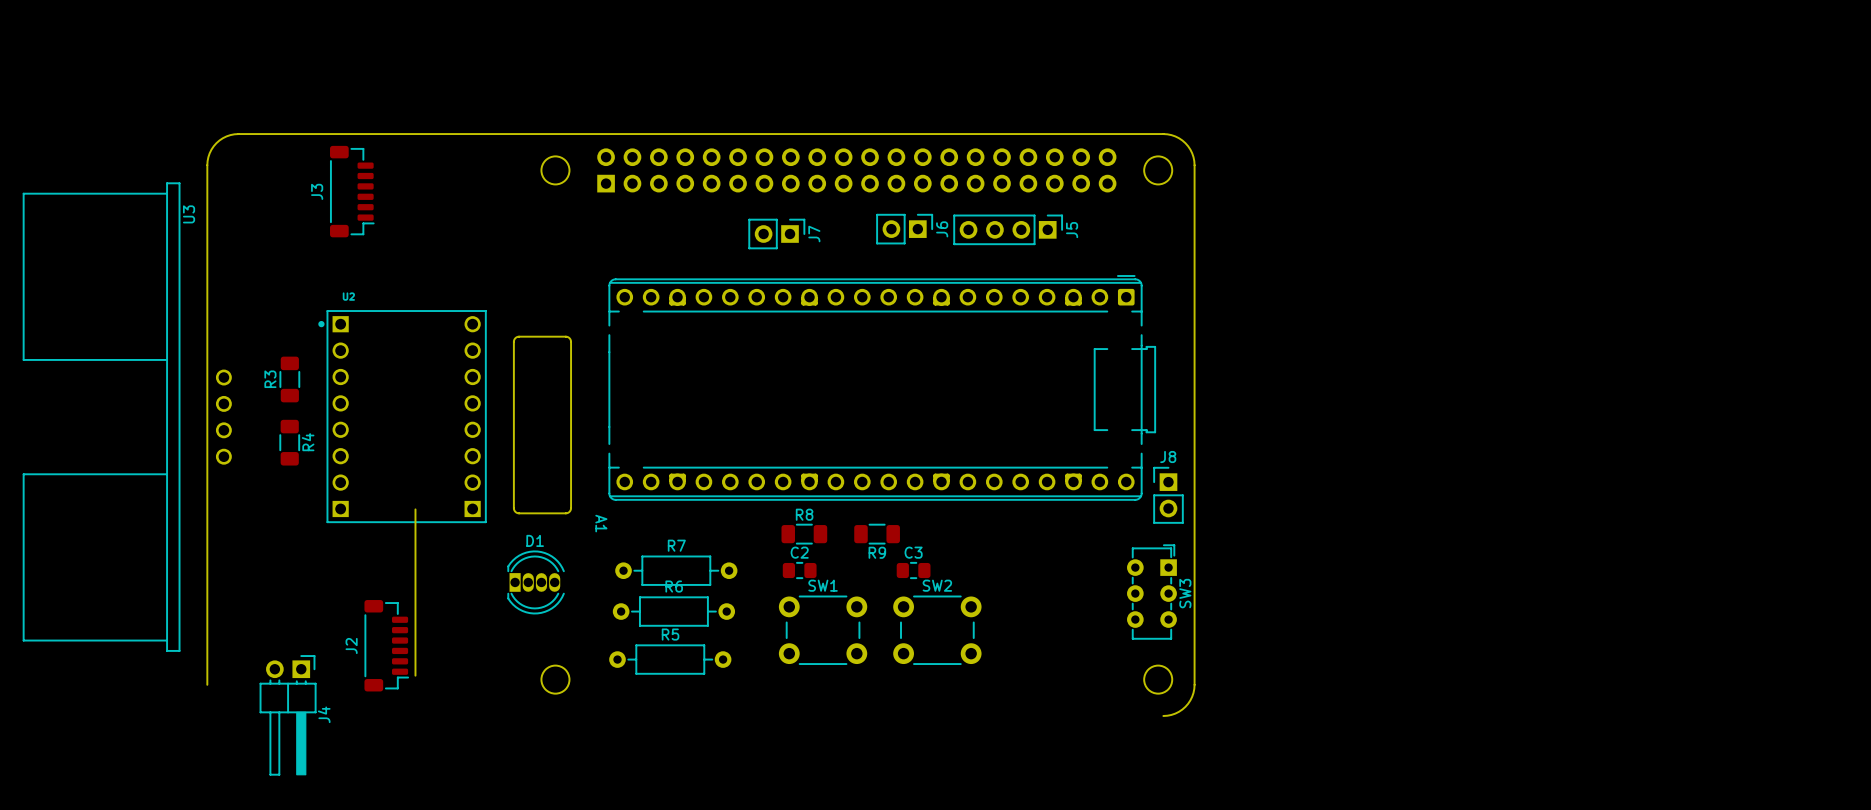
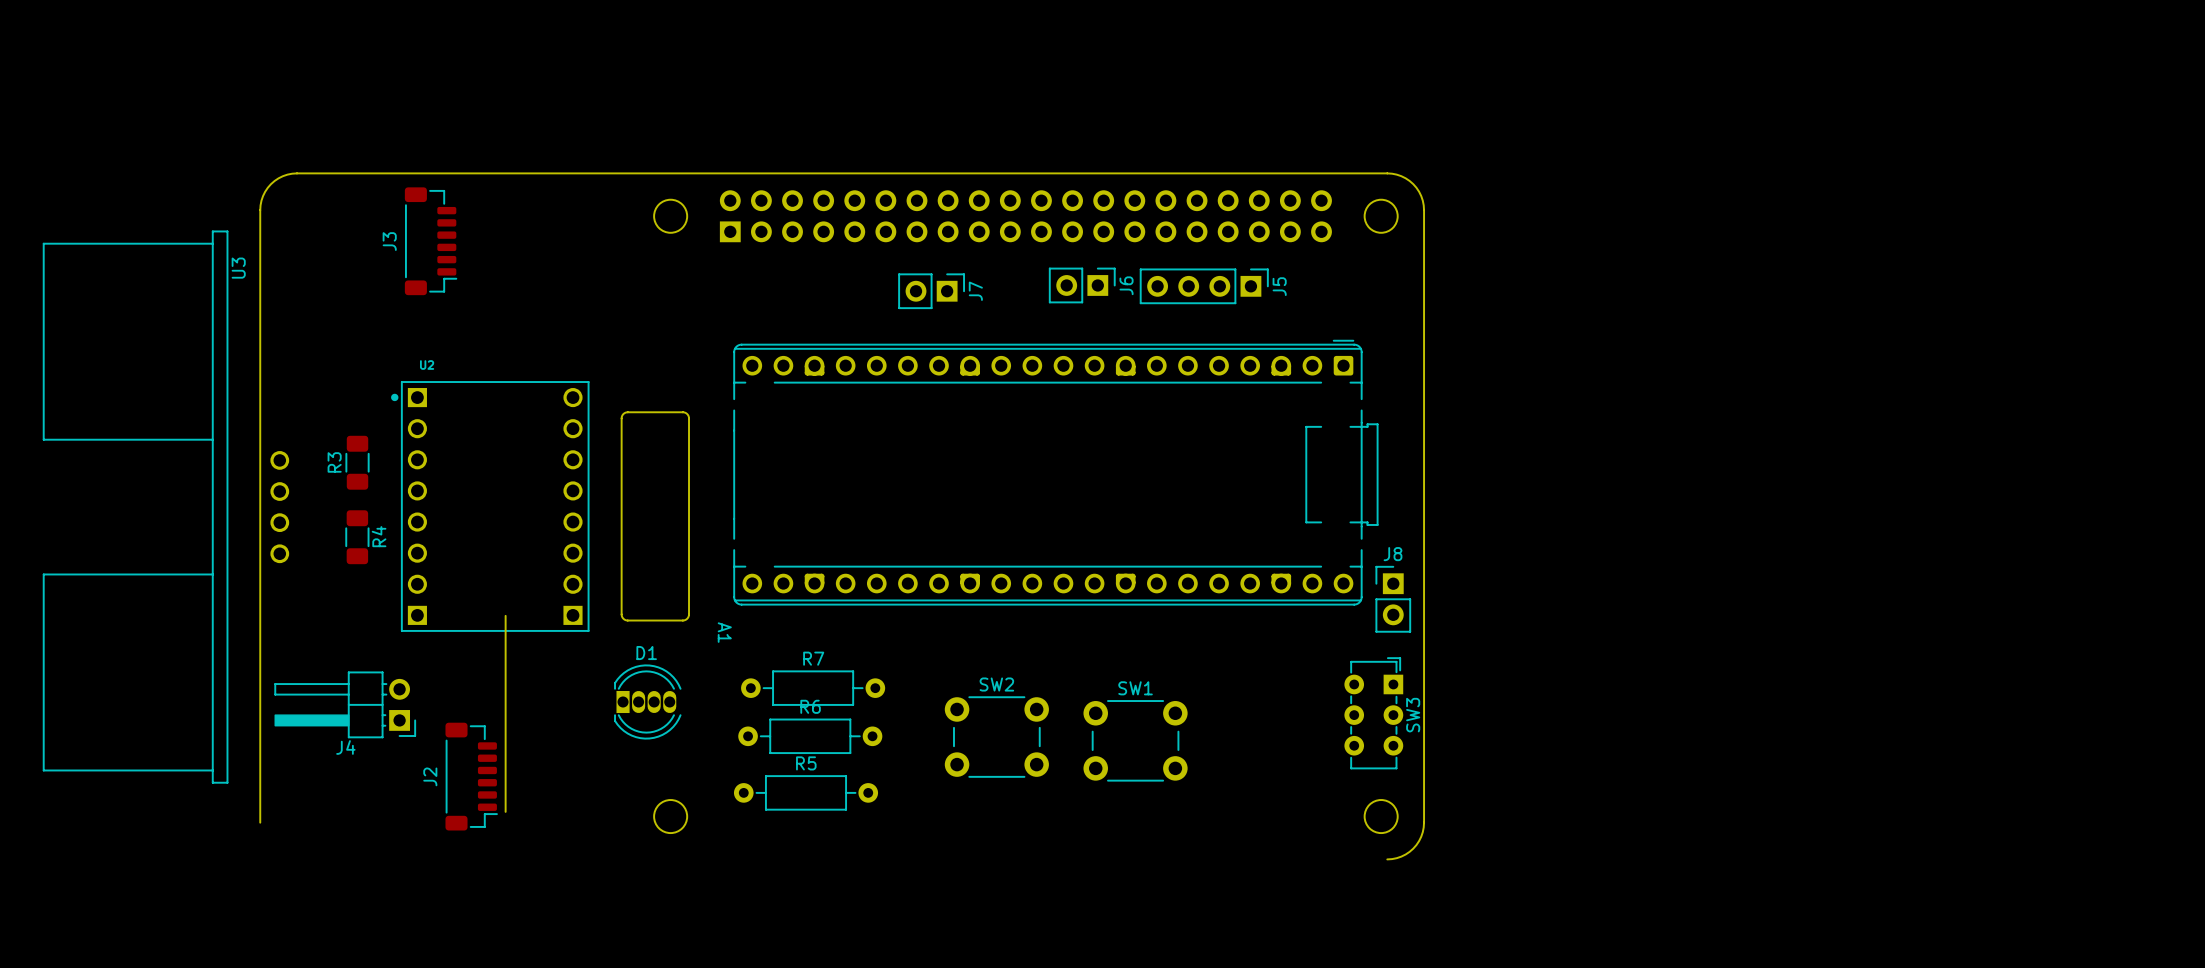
R8: (804, 534) -> none
R9: (877, 534) -> none
C2: (799, 570) -> none
C3: (913, 570) -> none
SW1 position: (823, 630) -> (1135, 740)
SW2 position: (937, 630) -> (996, 737)
J4 rotation: 0° (288, 715) -> 90° clockwise (345, 704)
J4 position: (288, 715) -> (345, 704)

